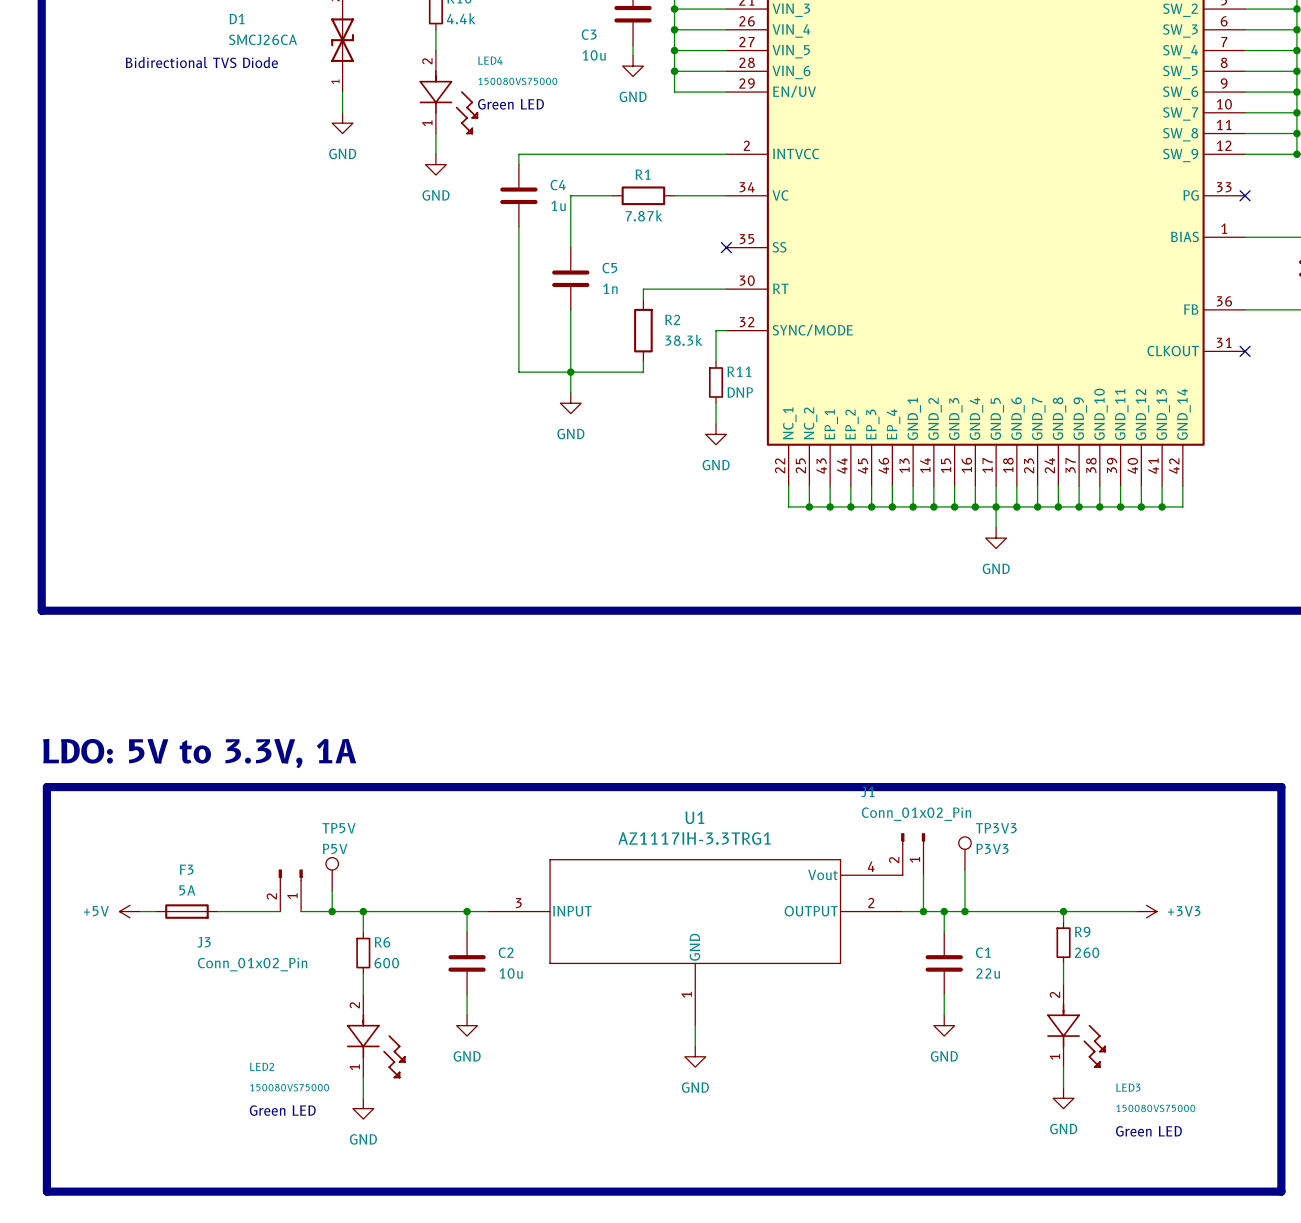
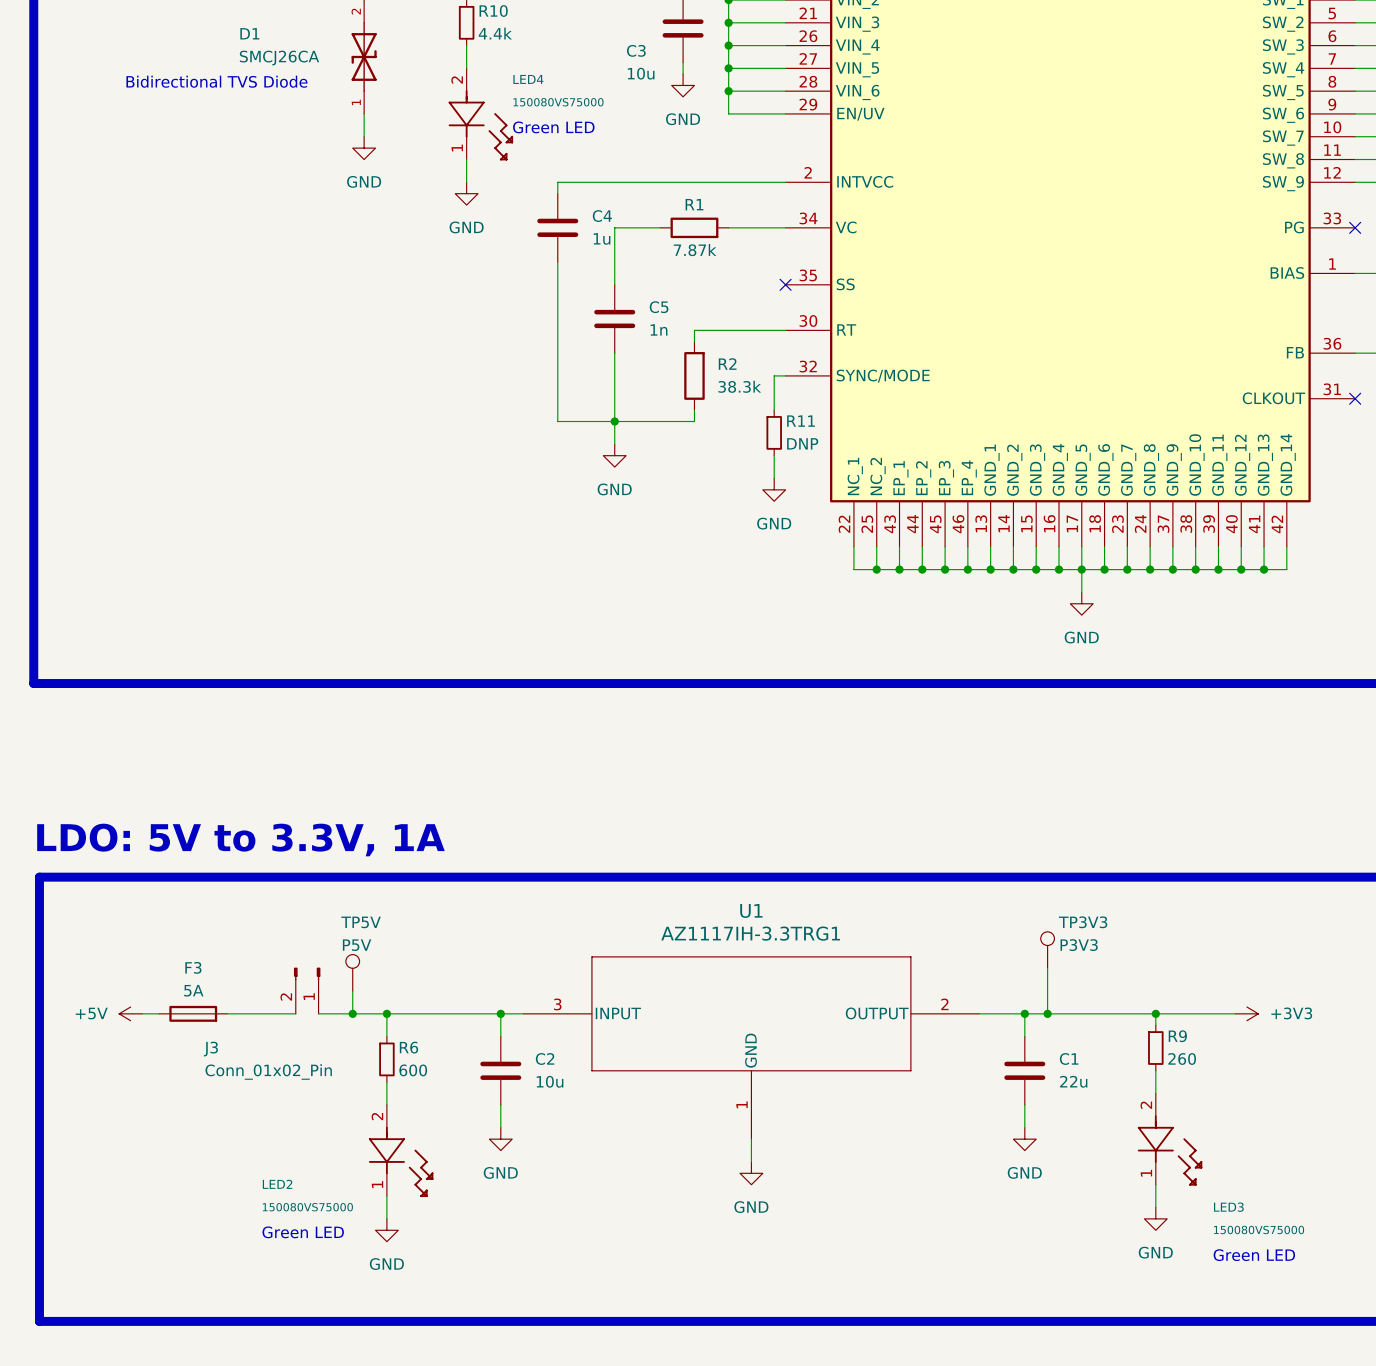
J1: Conn_01x02_Pin (913, 854) -> none
U1 symbol: [487, 859, 903, 1026] -> [523, 956, 980, 1140]
wire: (923, 875) (923, 911) -> none
junction: (923, 911) -> none

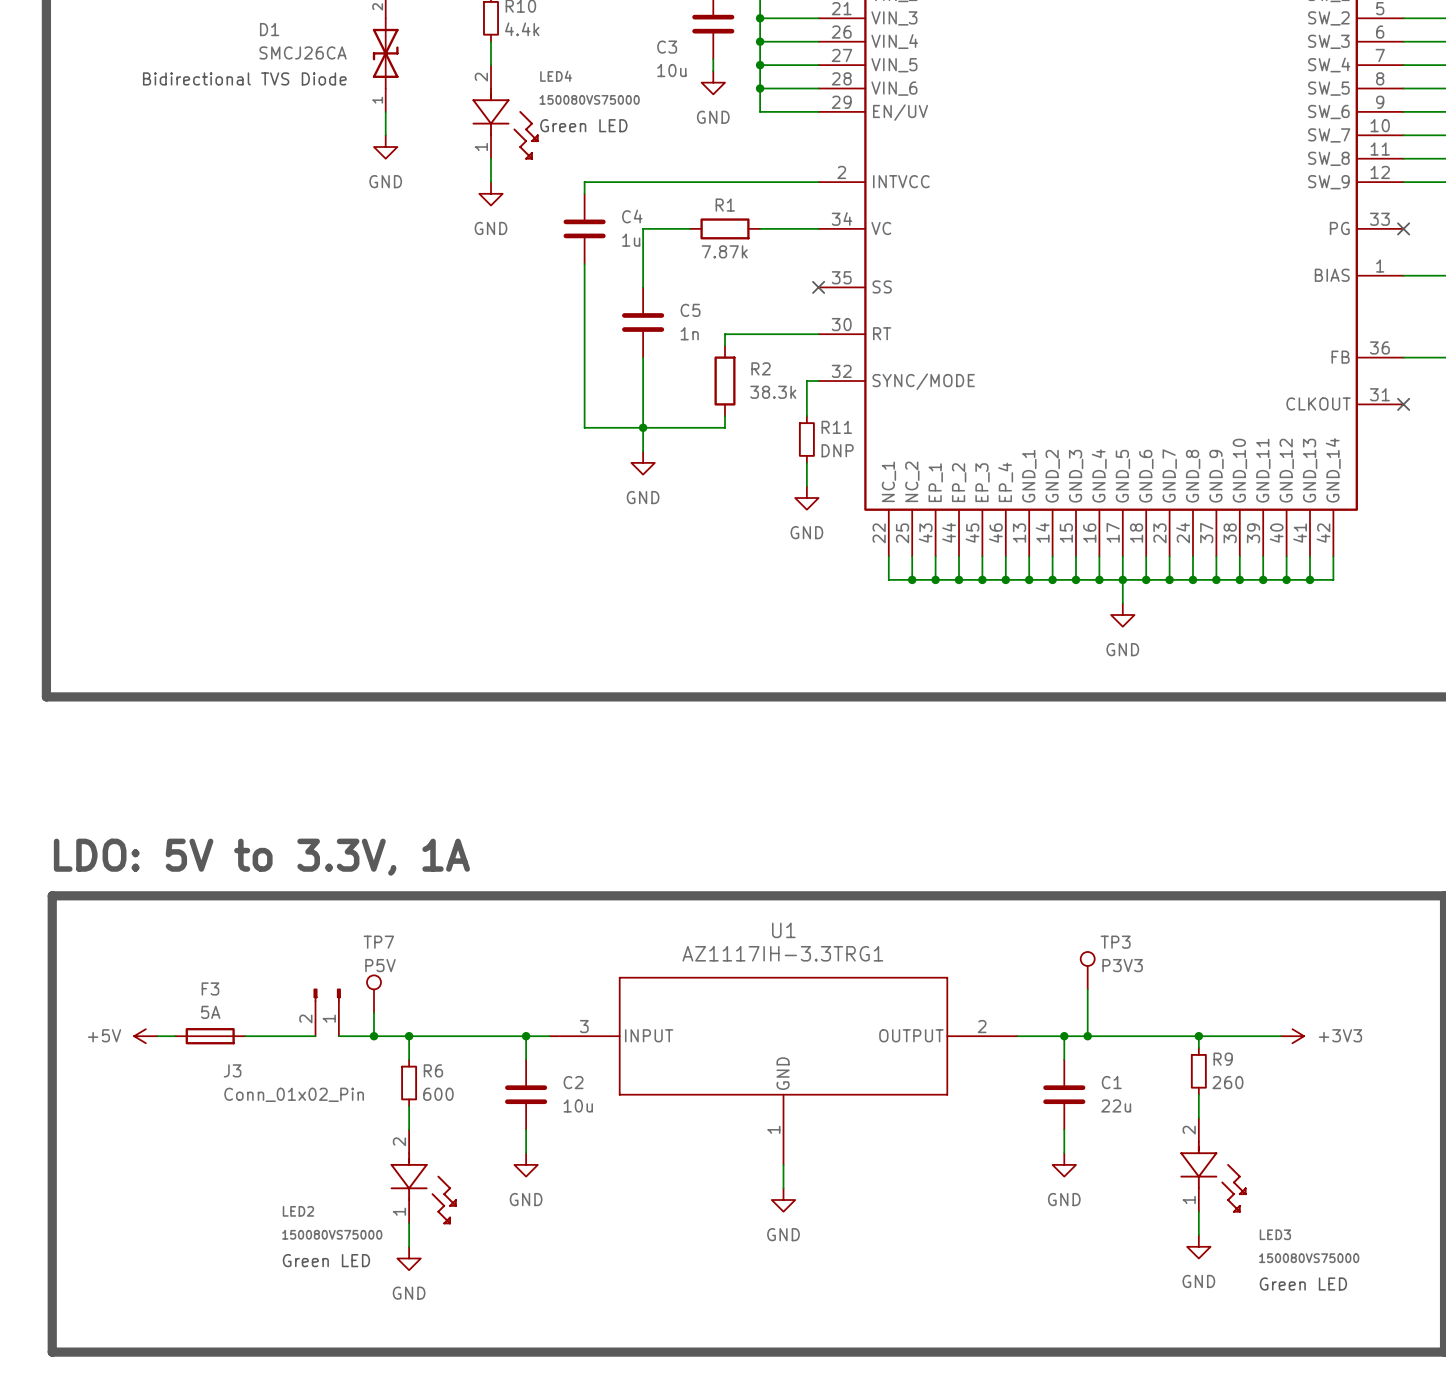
TP5V name: TP5V (361, 922) -> TP7 (378, 942)
TP3V3 name: TP3V3 (1083, 922) -> TP3 (1115, 942)

